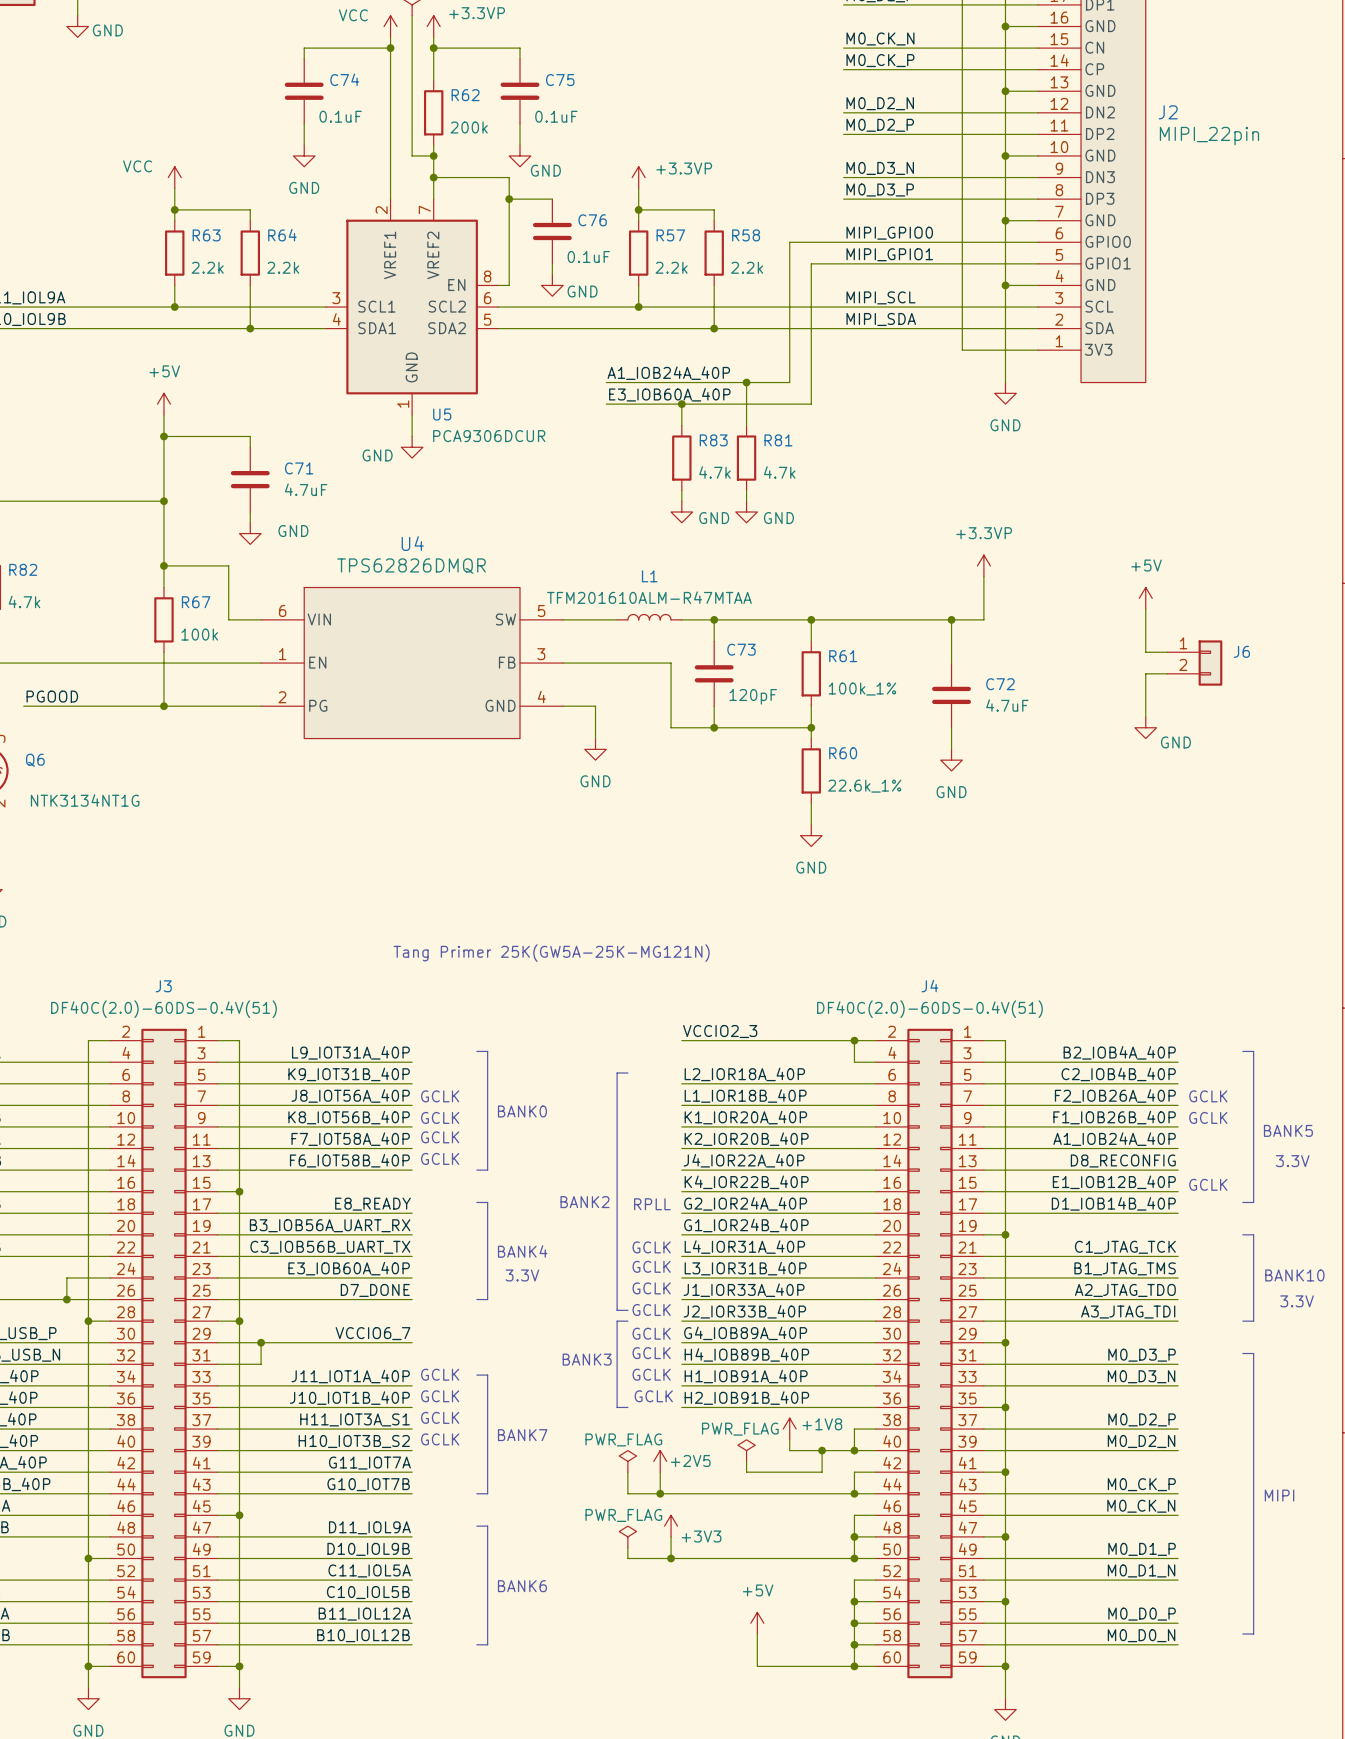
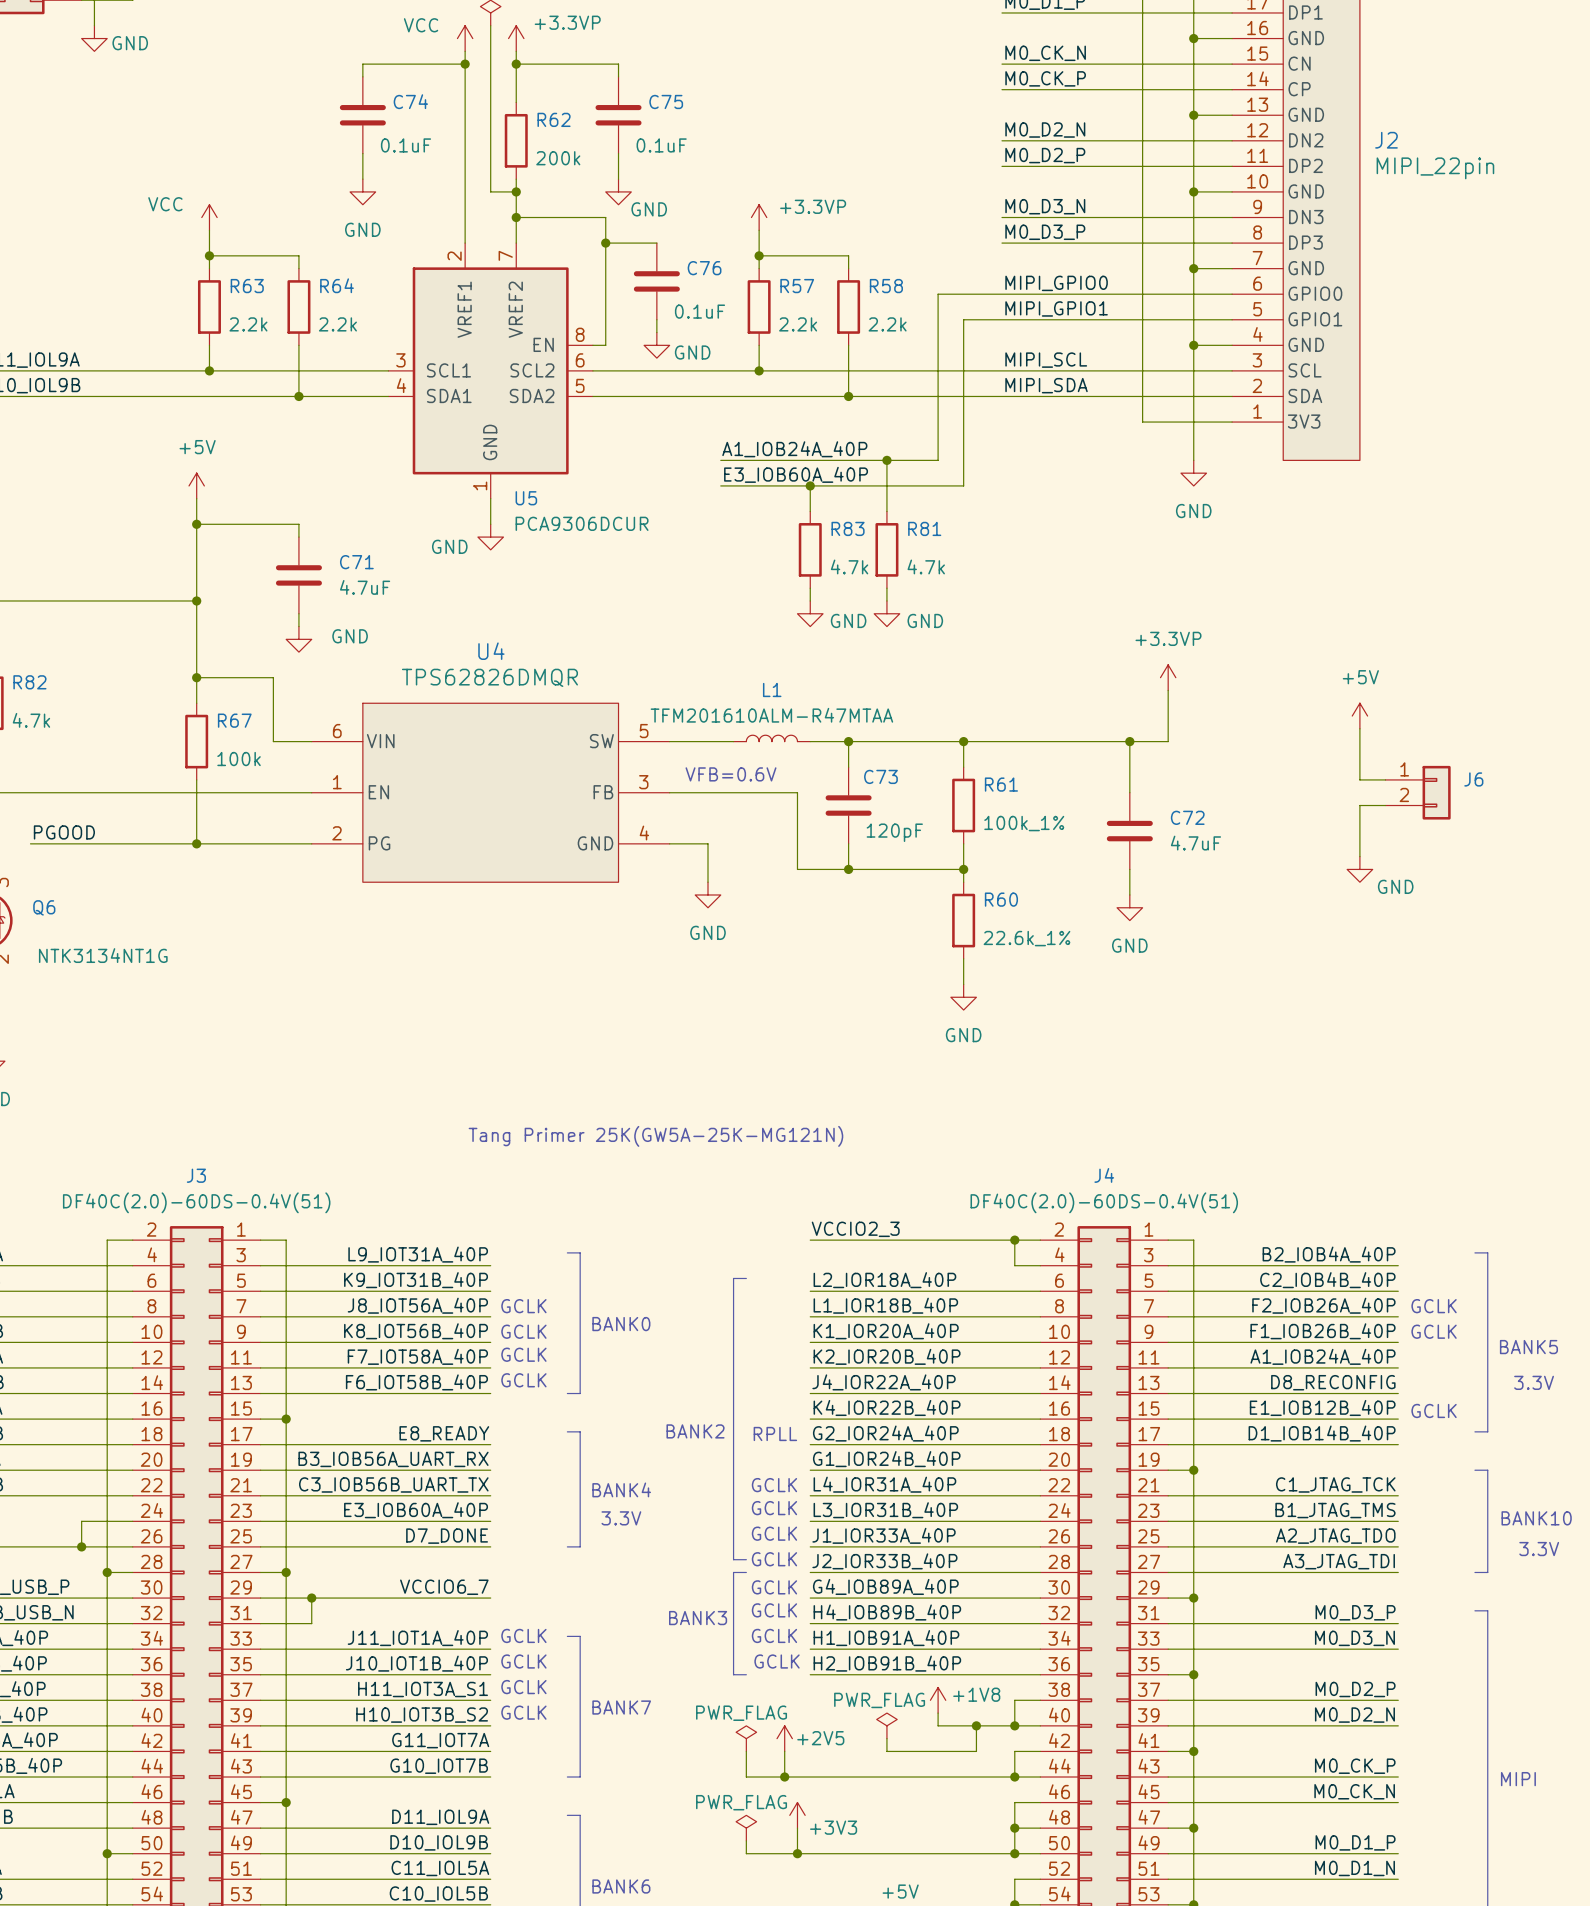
text: none -> VFB=0.6V (731, 774)

